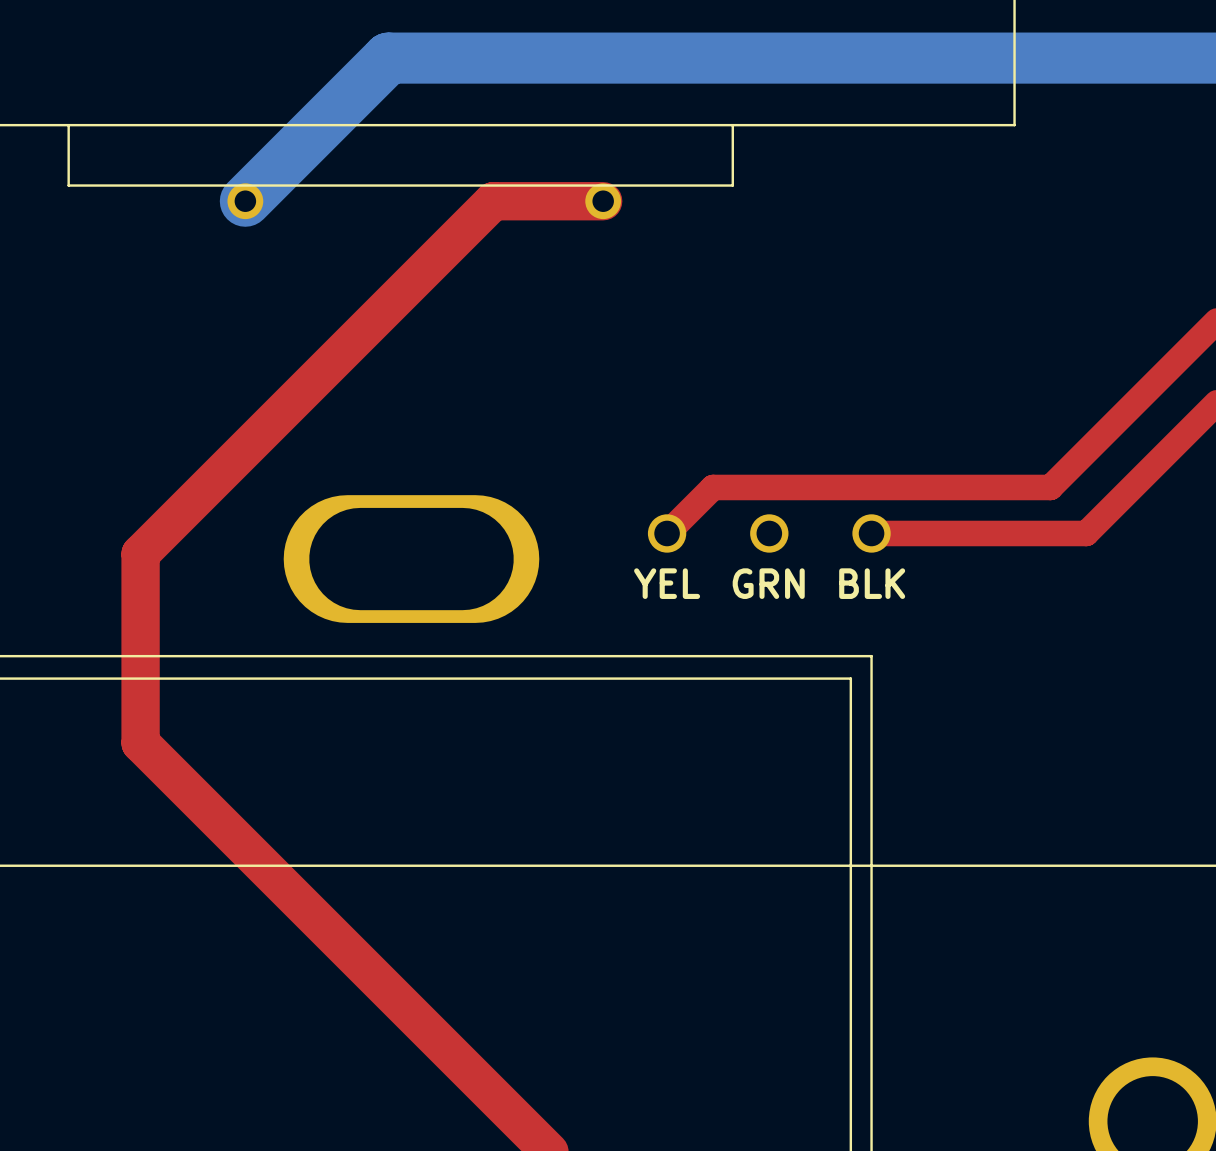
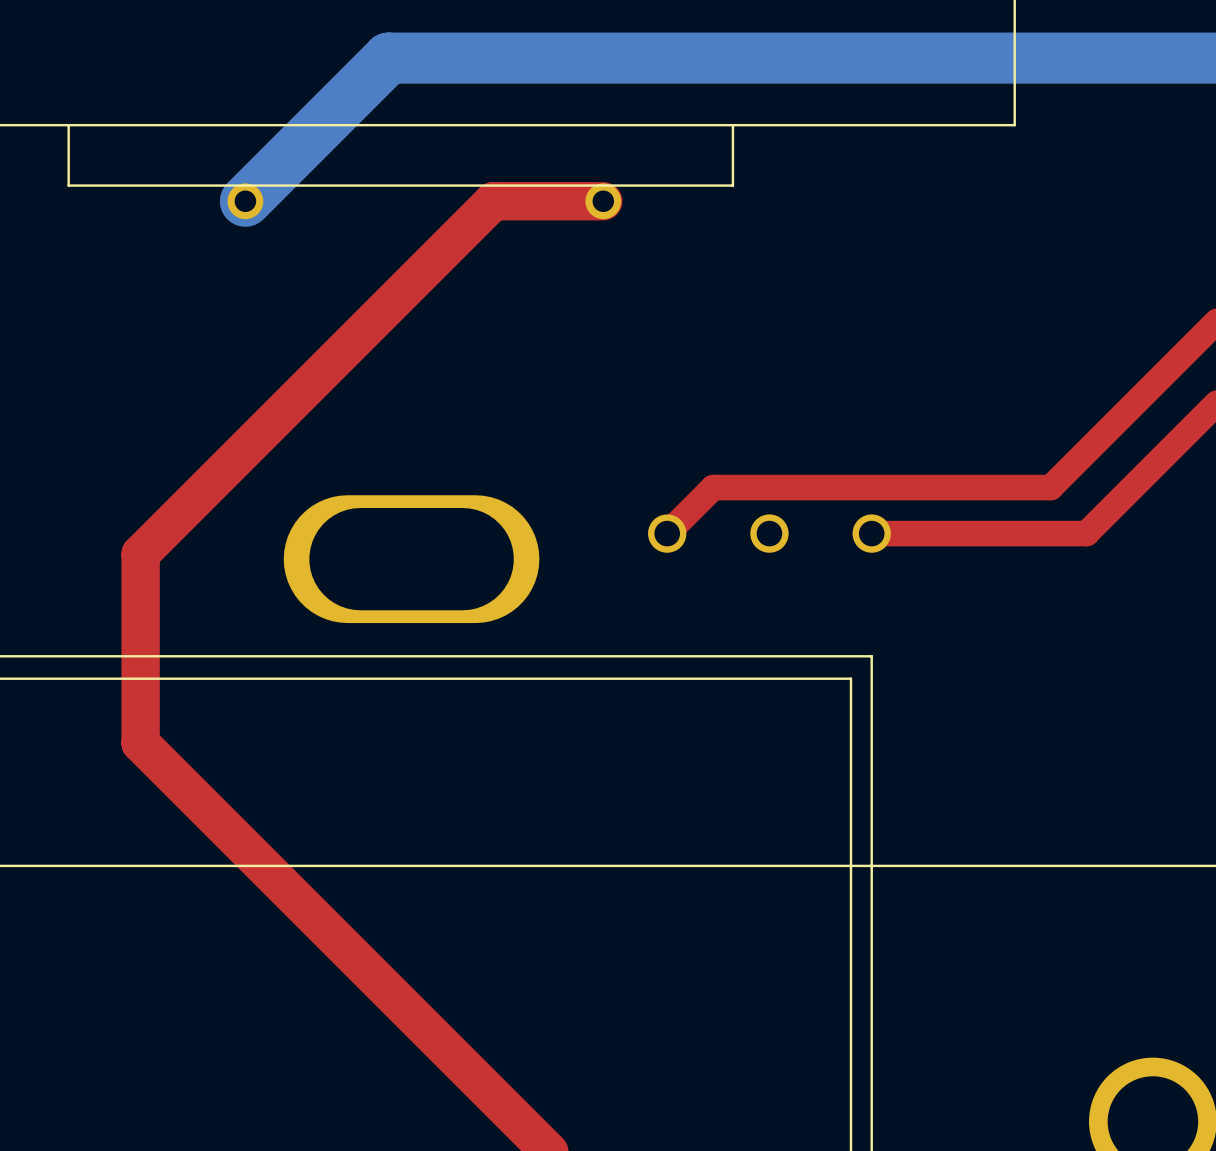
part text: YEL (667, 583) -> none
part text: GRN (768, 583) -> none
part text: BLK (872, 583) -> none

